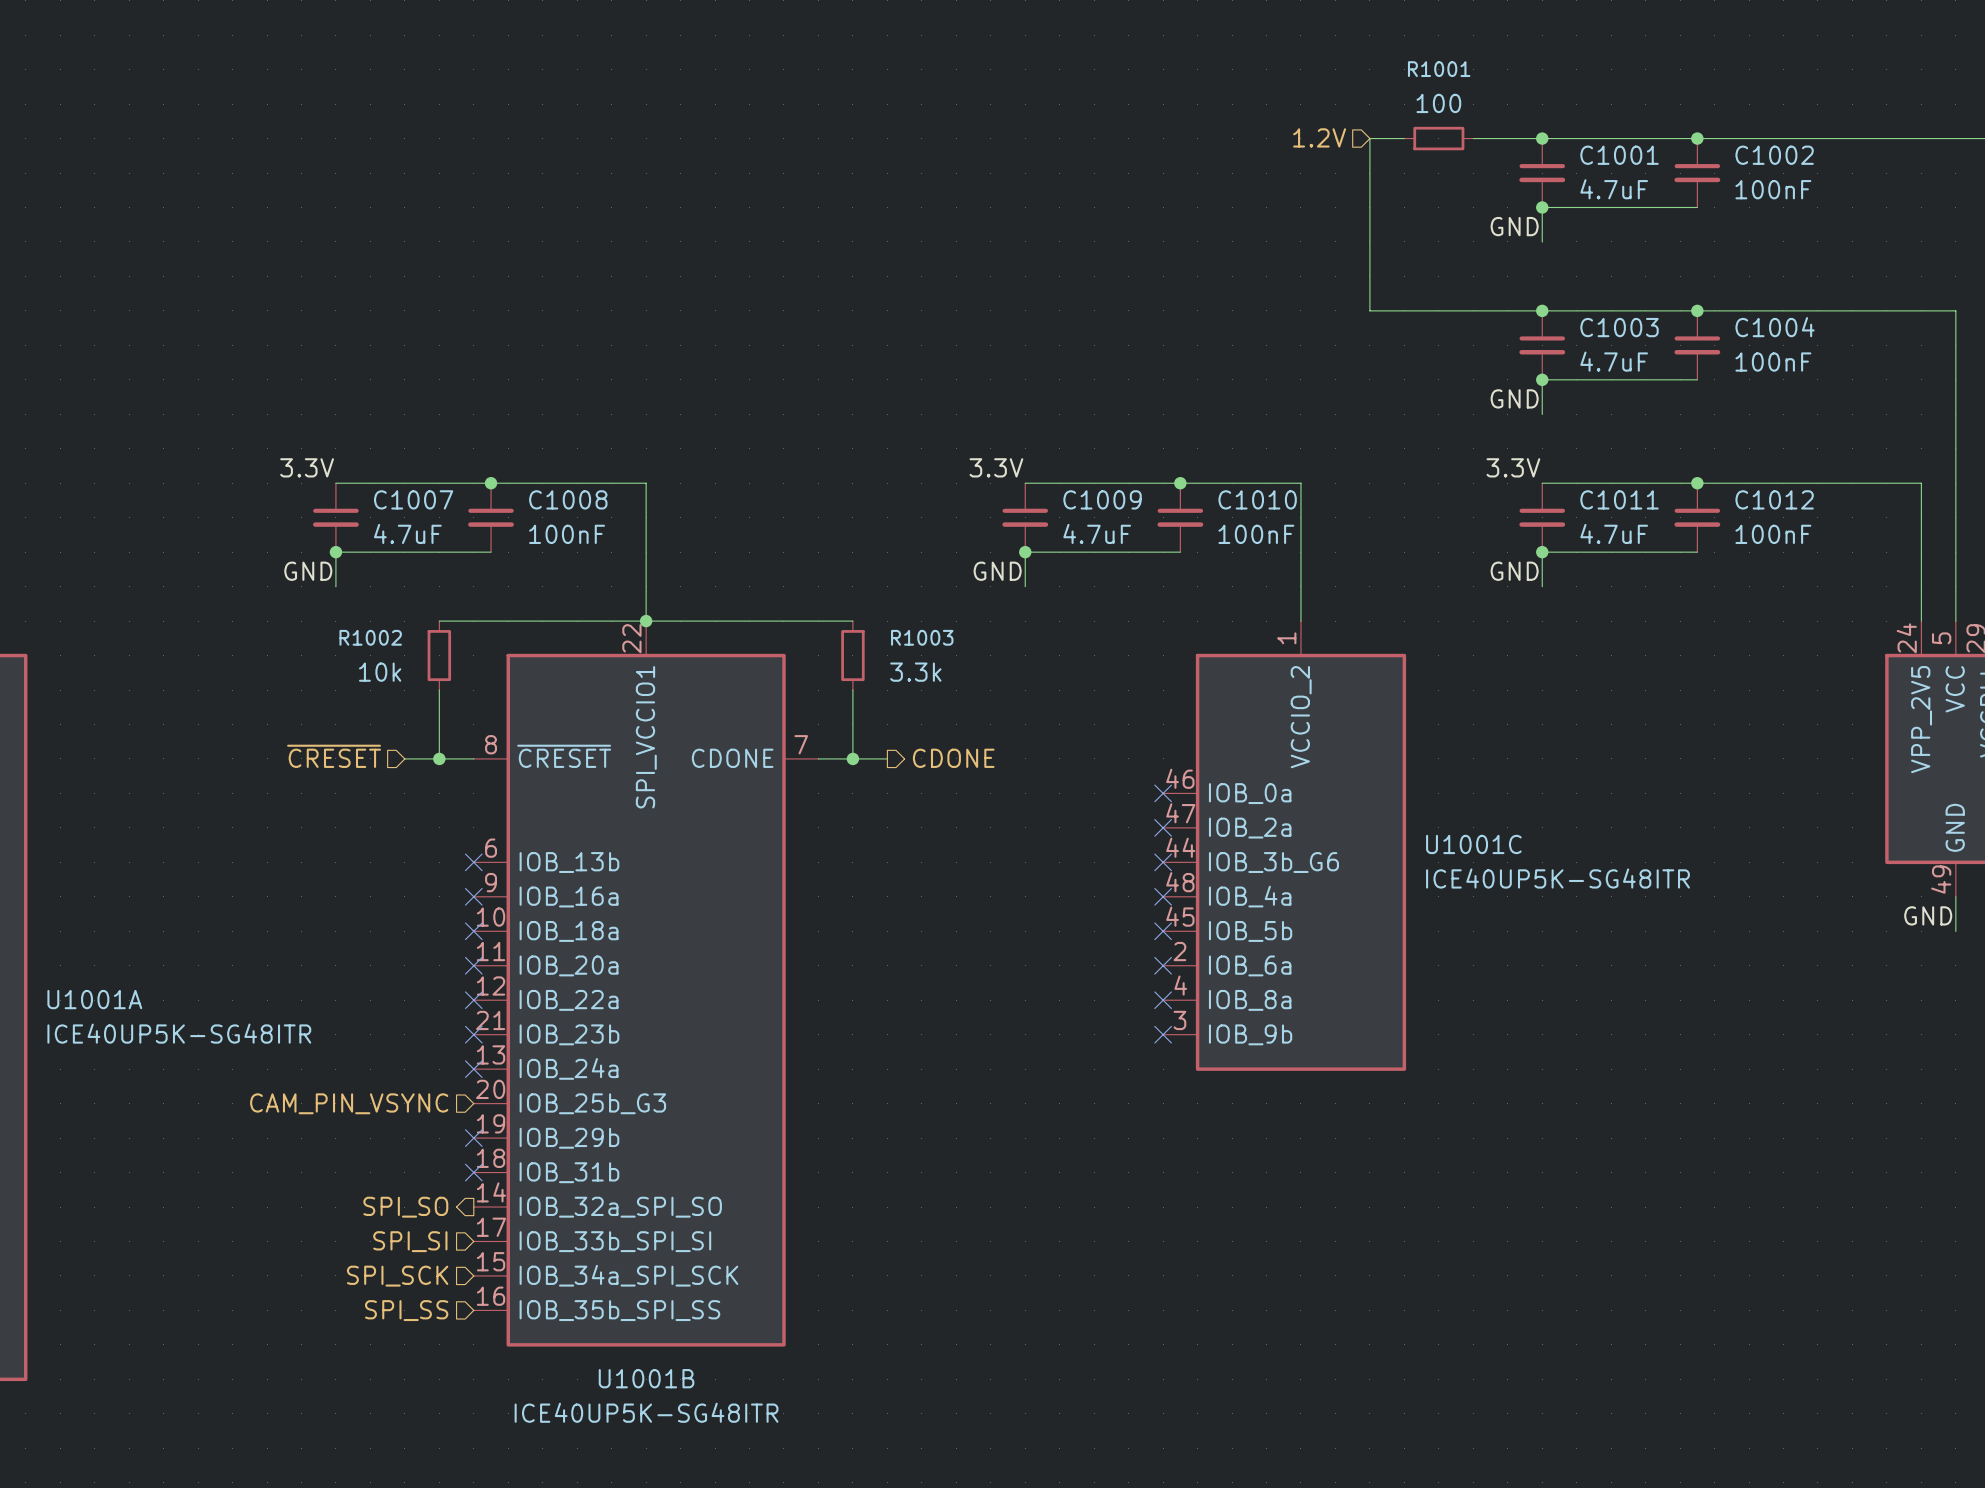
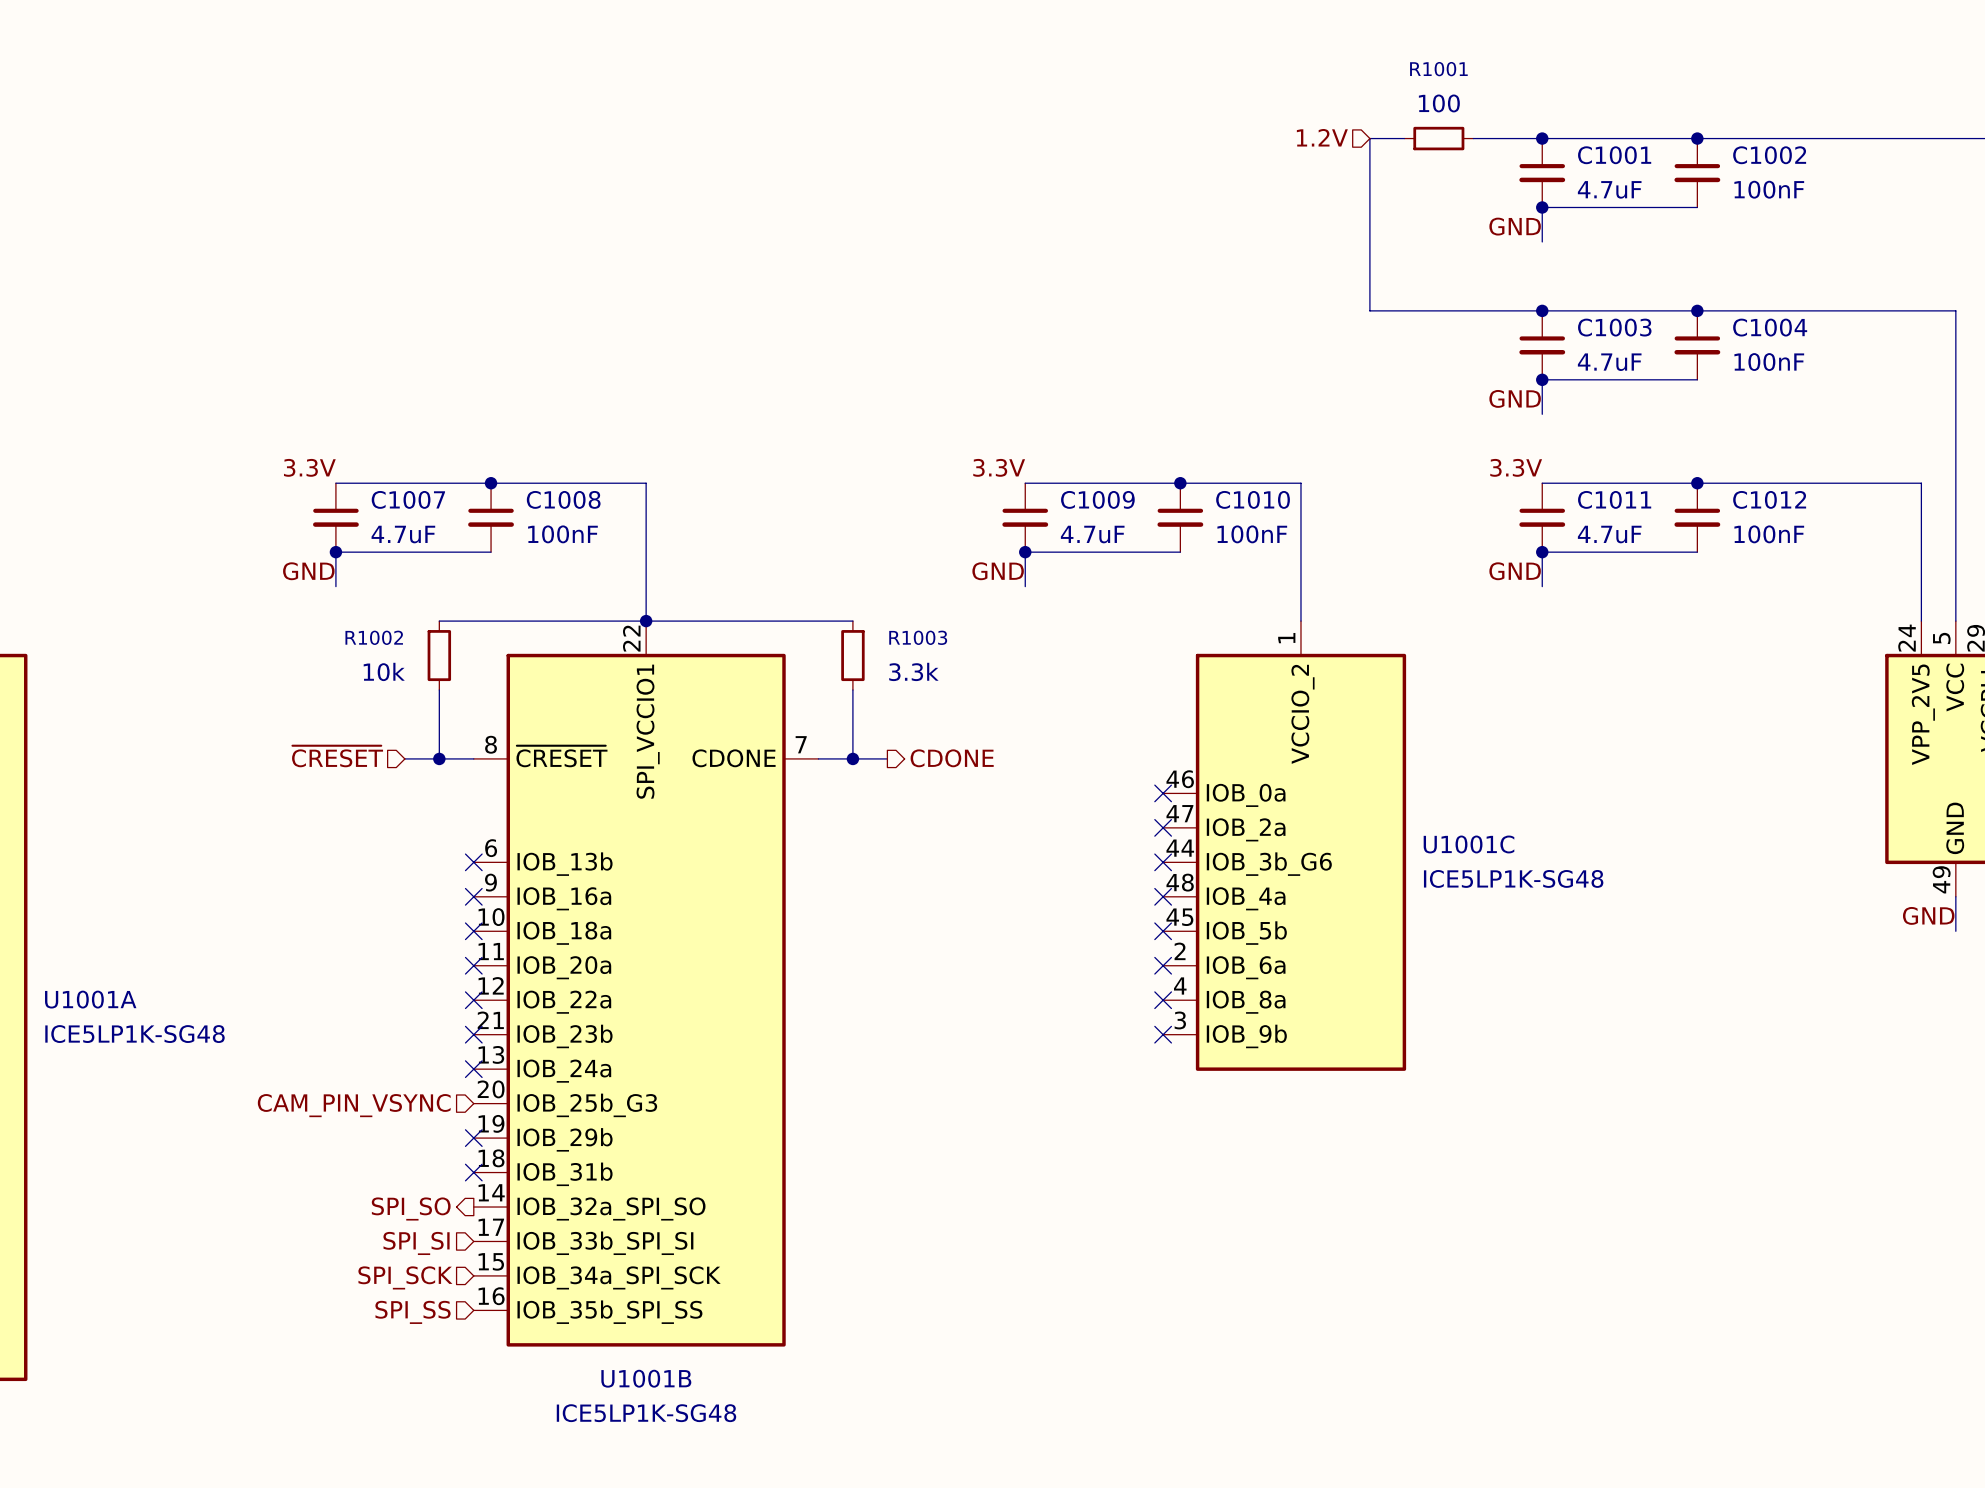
U1001C value: ICE40UP5K-SG48ITR (1557, 878) -> ICE5LP1K-SG48 (1513, 878)
U1001A value: ICE40UP5K-SG48ITR (179, 1033) -> ICE5LP1K-SG48 (134, 1034)
U1001B value: ICE40UP5K-SG48ITR (646, 1412) -> ICE5LP1K-SG48 (646, 1413)

